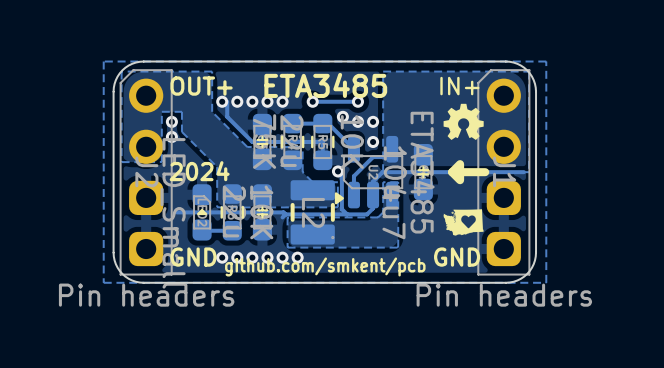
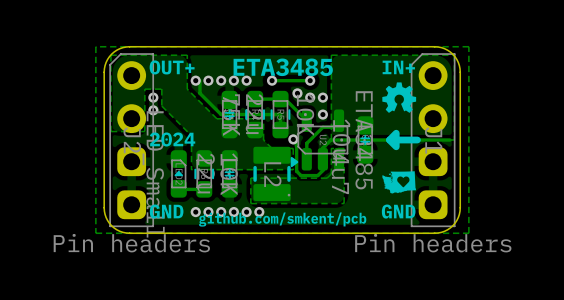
track: (176, 212) (283, 212) (285, 214) -> none
track: (285, 214) (282, 217) -> none
track: (347, 214) (285, 214) -> none

